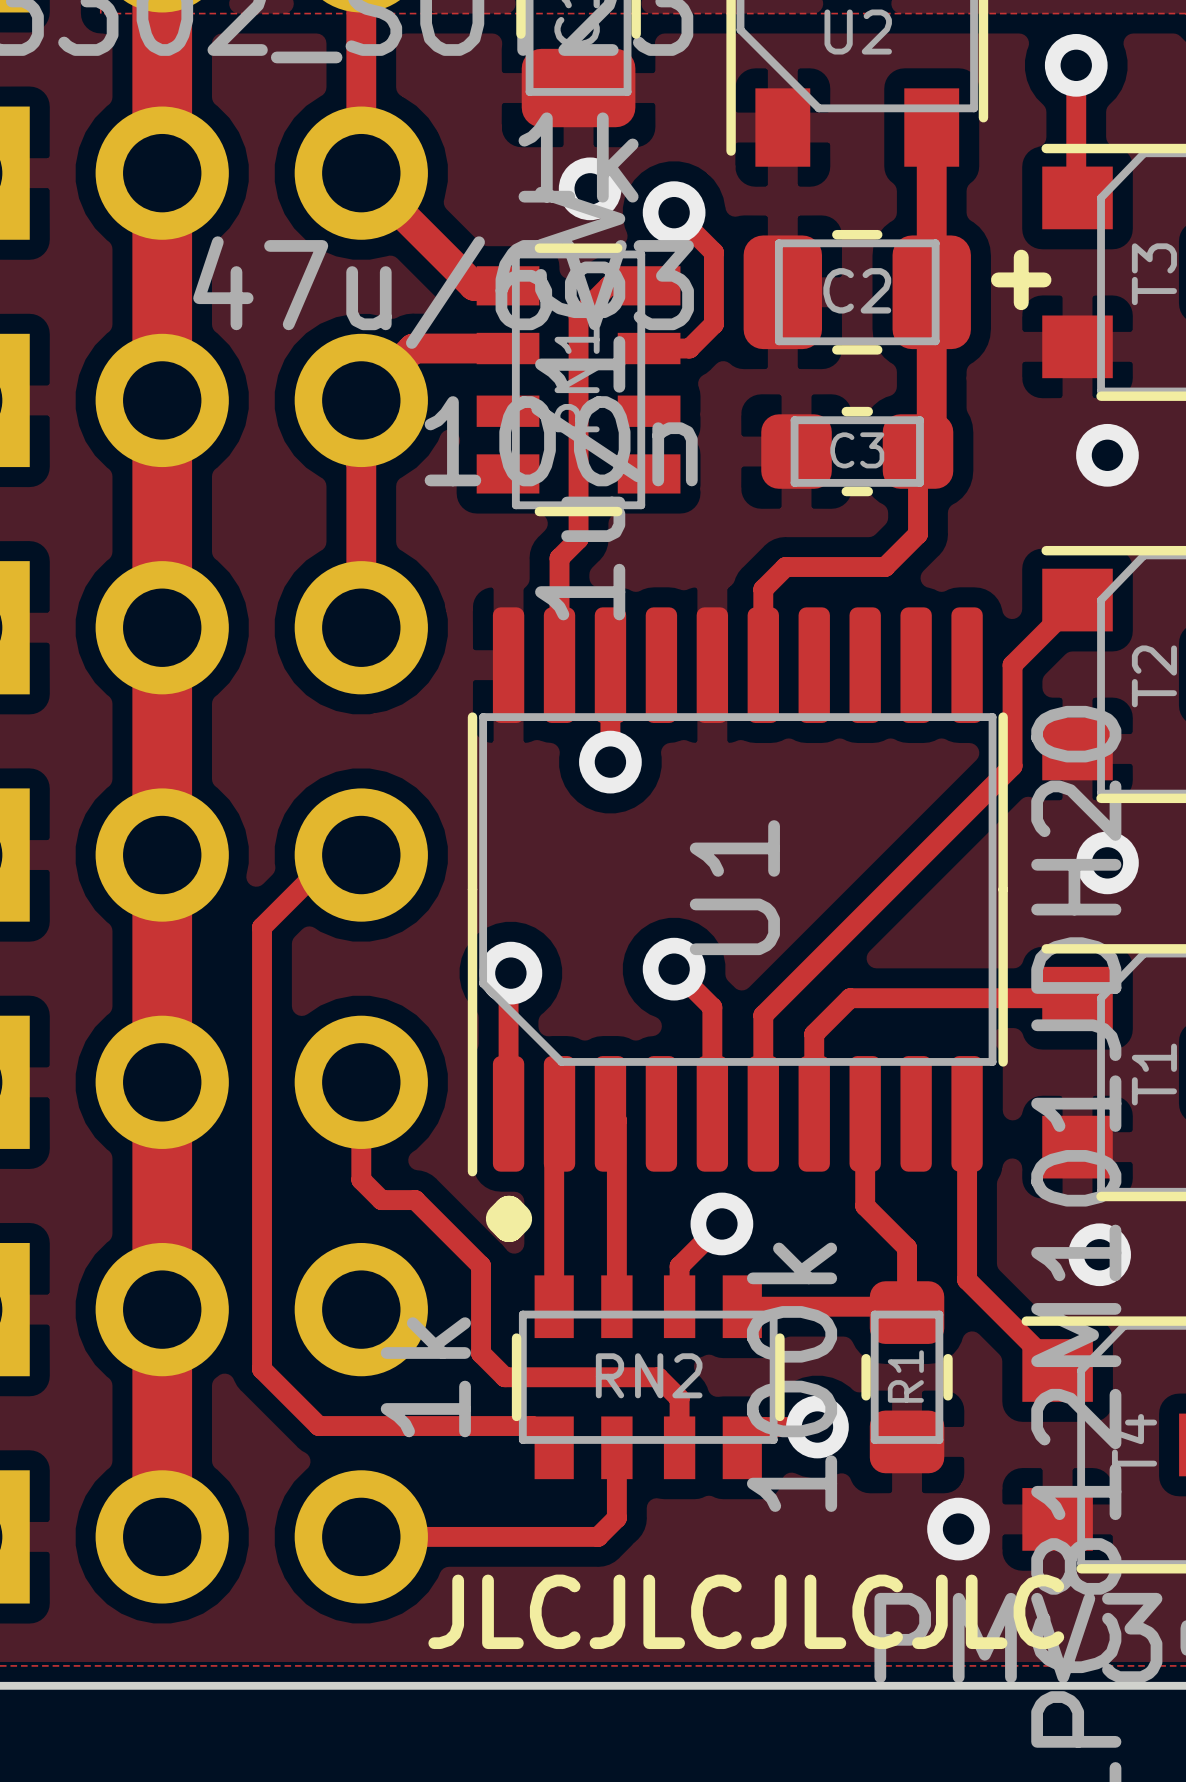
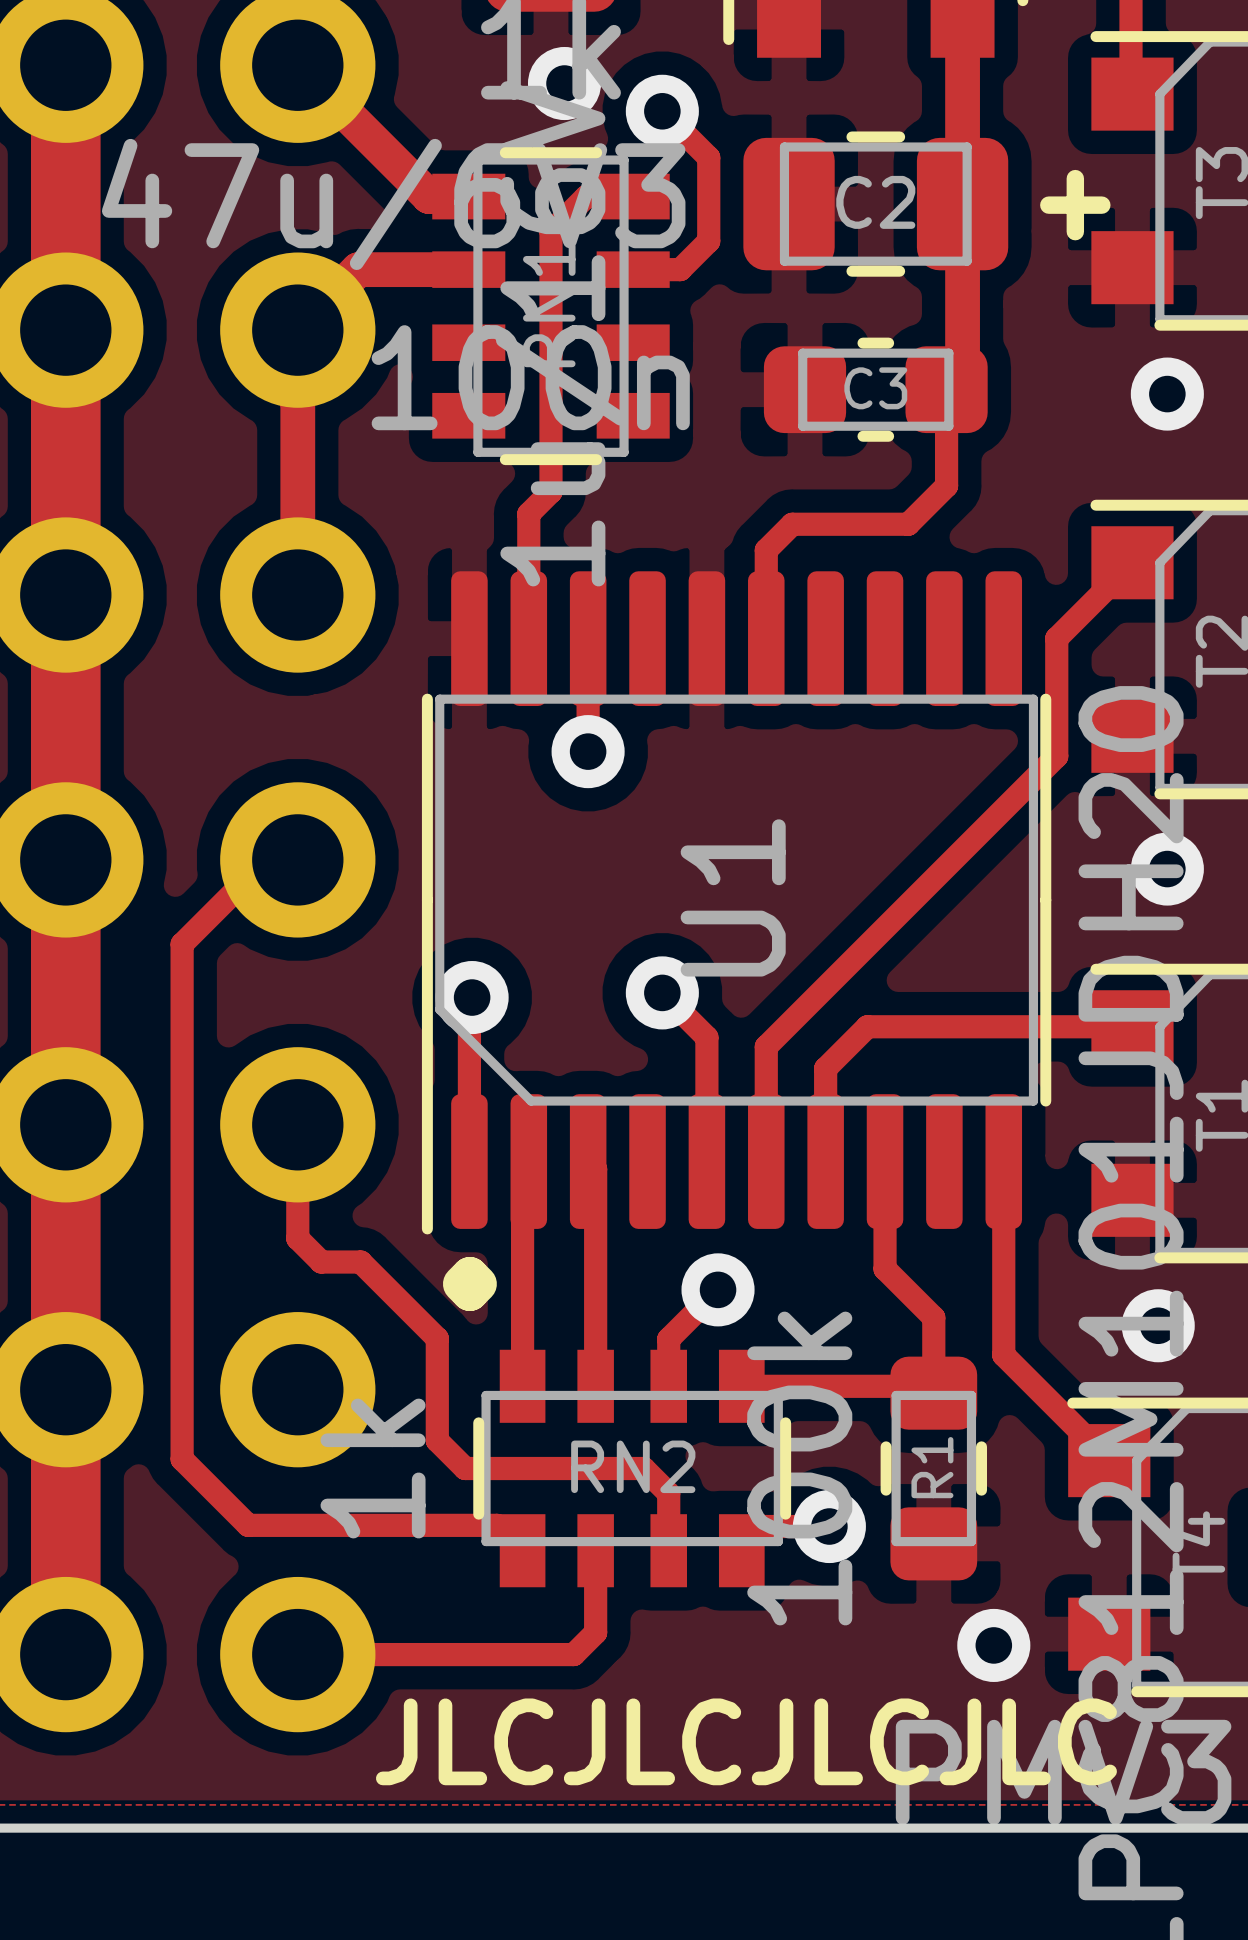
text position: + (1021, 279) -> + (1075, 205)

